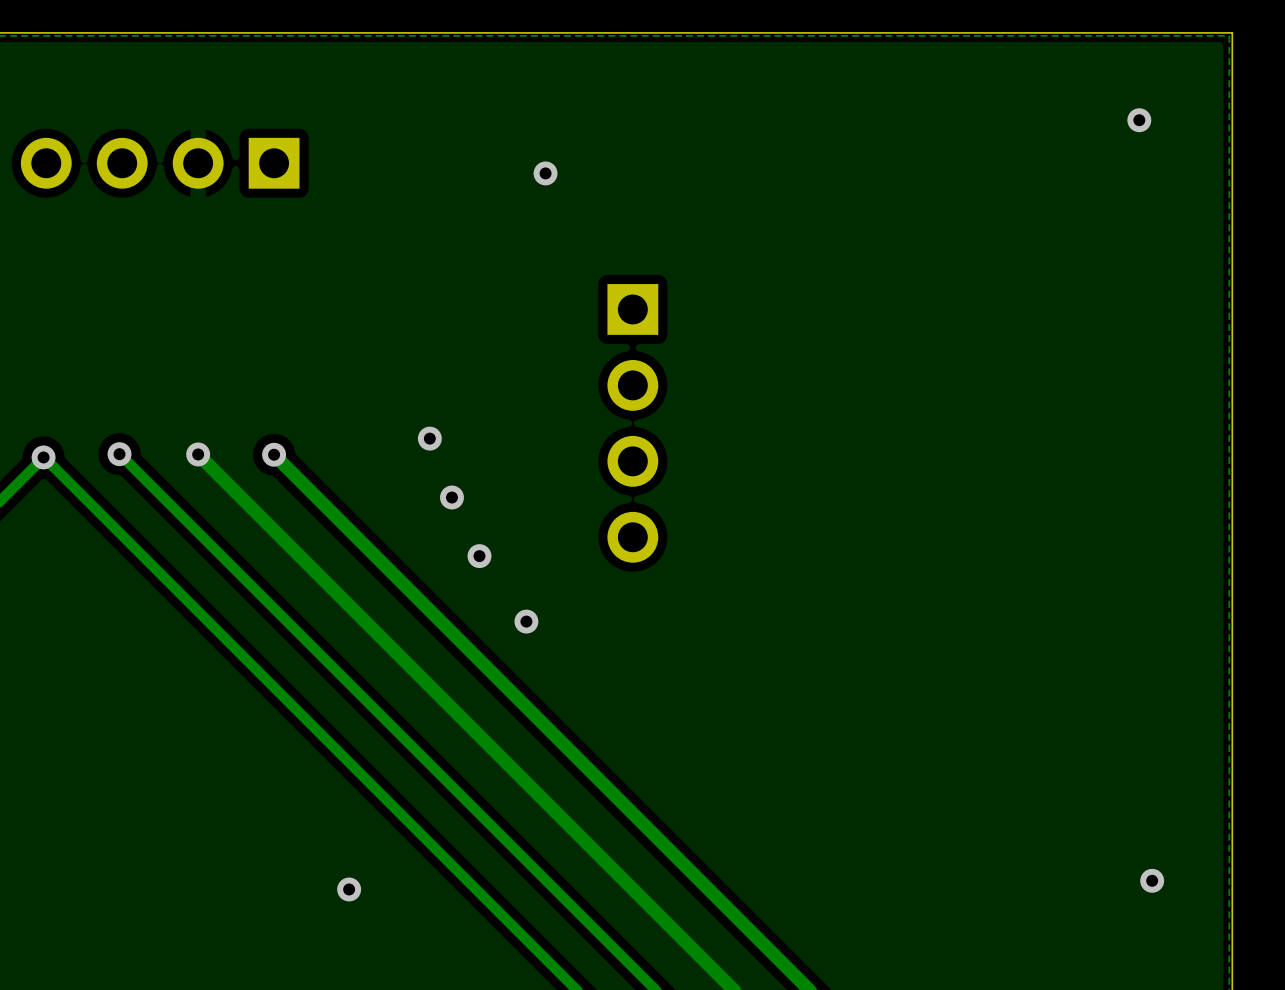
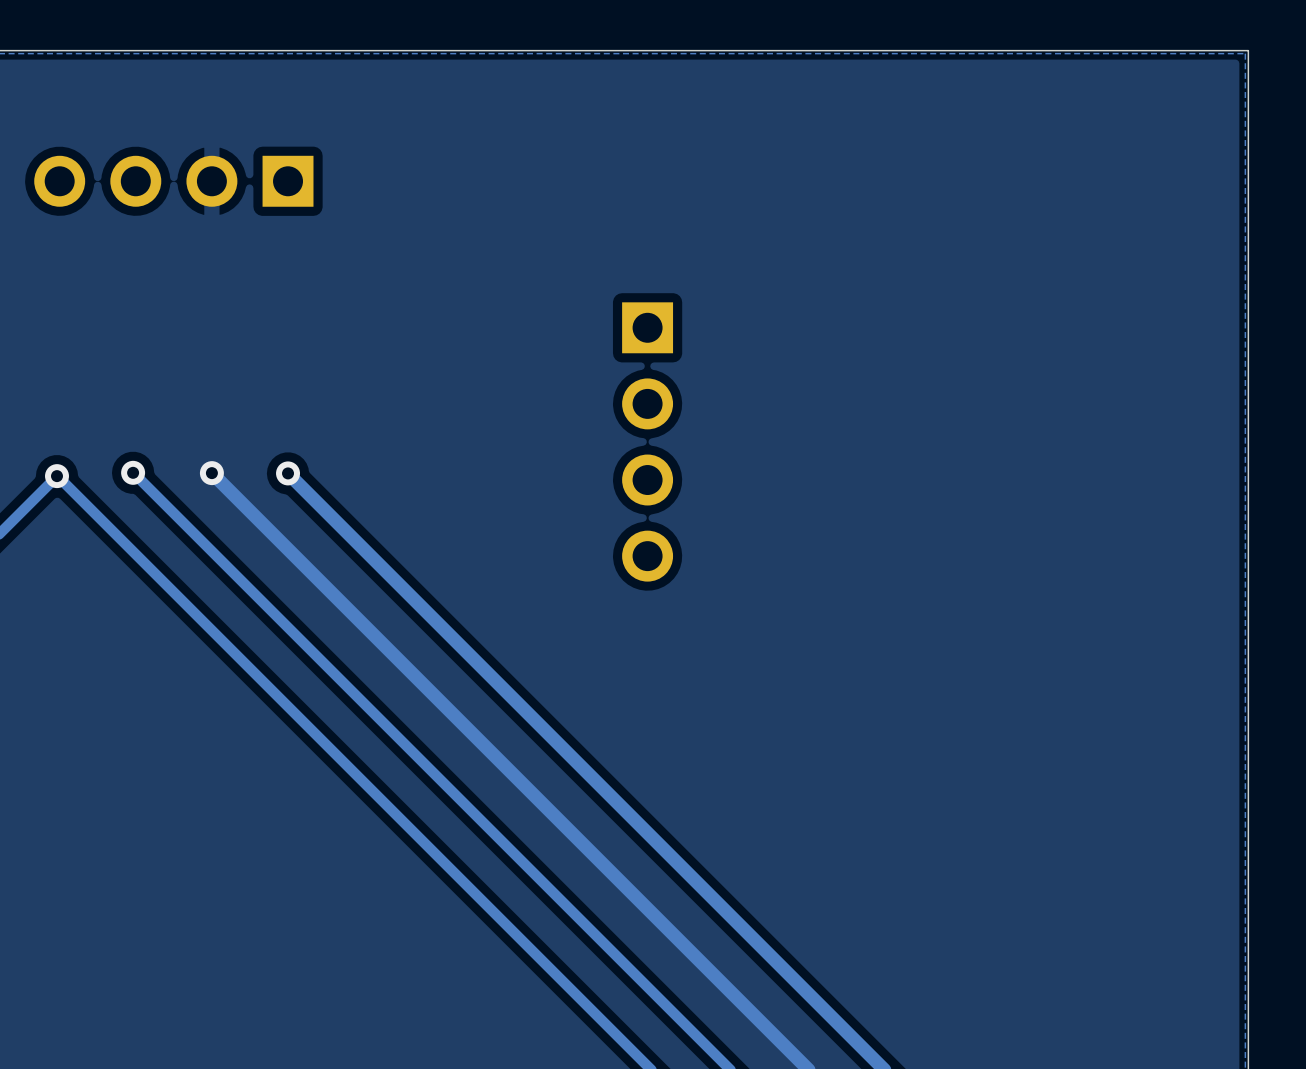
via: (1139, 120) -> none
via: (545, 173) -> none
via: (429, 438) -> none
via: (451, 497) -> none
via: (479, 556) -> none
via: (526, 621) -> none
via: (1152, 880) -> none
via: (349, 889) -> none

